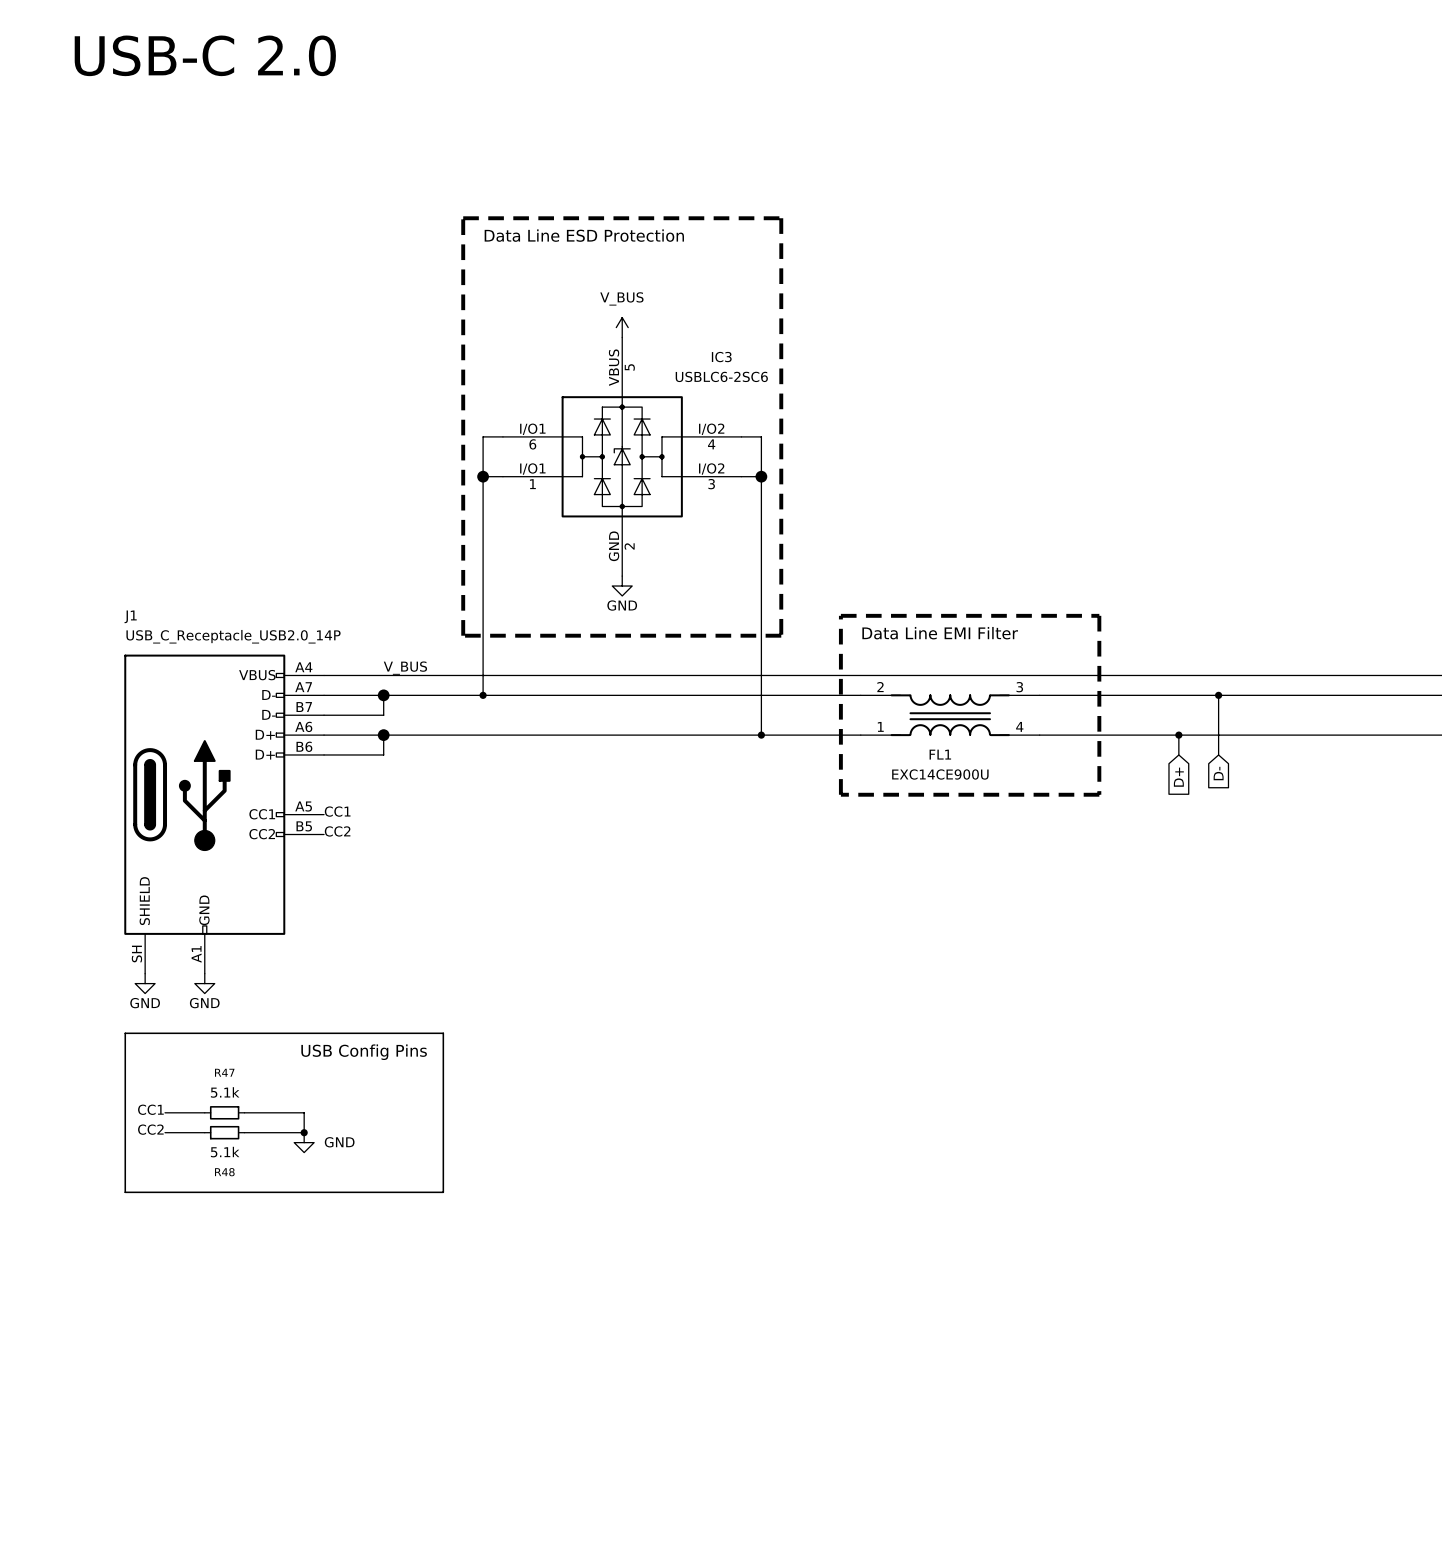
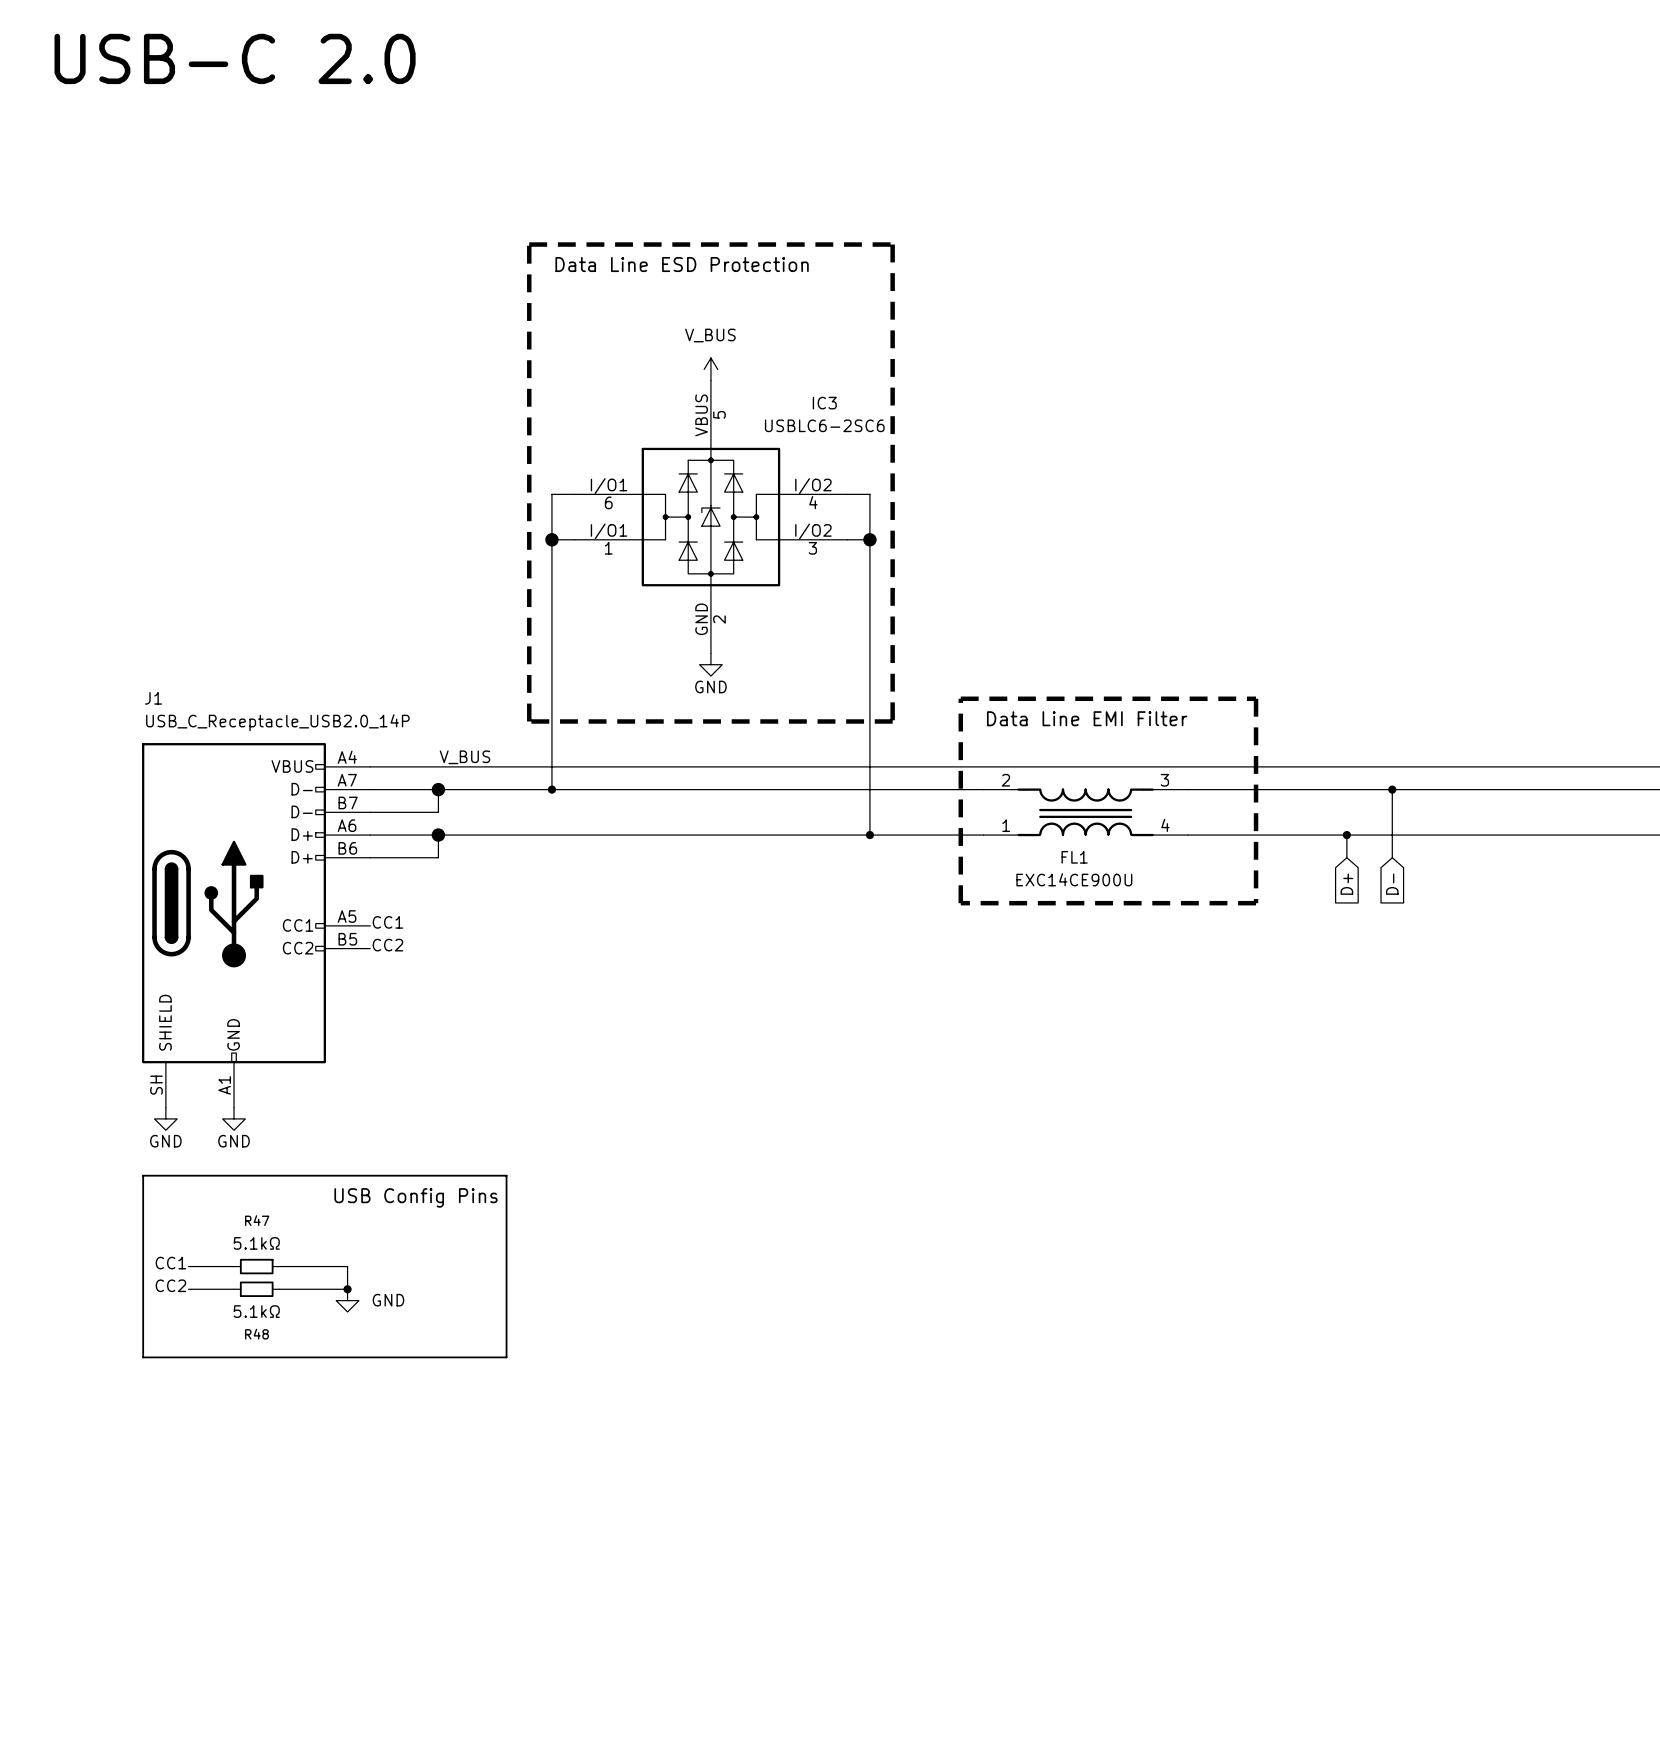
R47 value: 5.1k (225, 1092) -> 5.1kΩ (256, 1243)
R48 value: 5.1k (225, 1152) -> 5.1kΩ (256, 1311)

